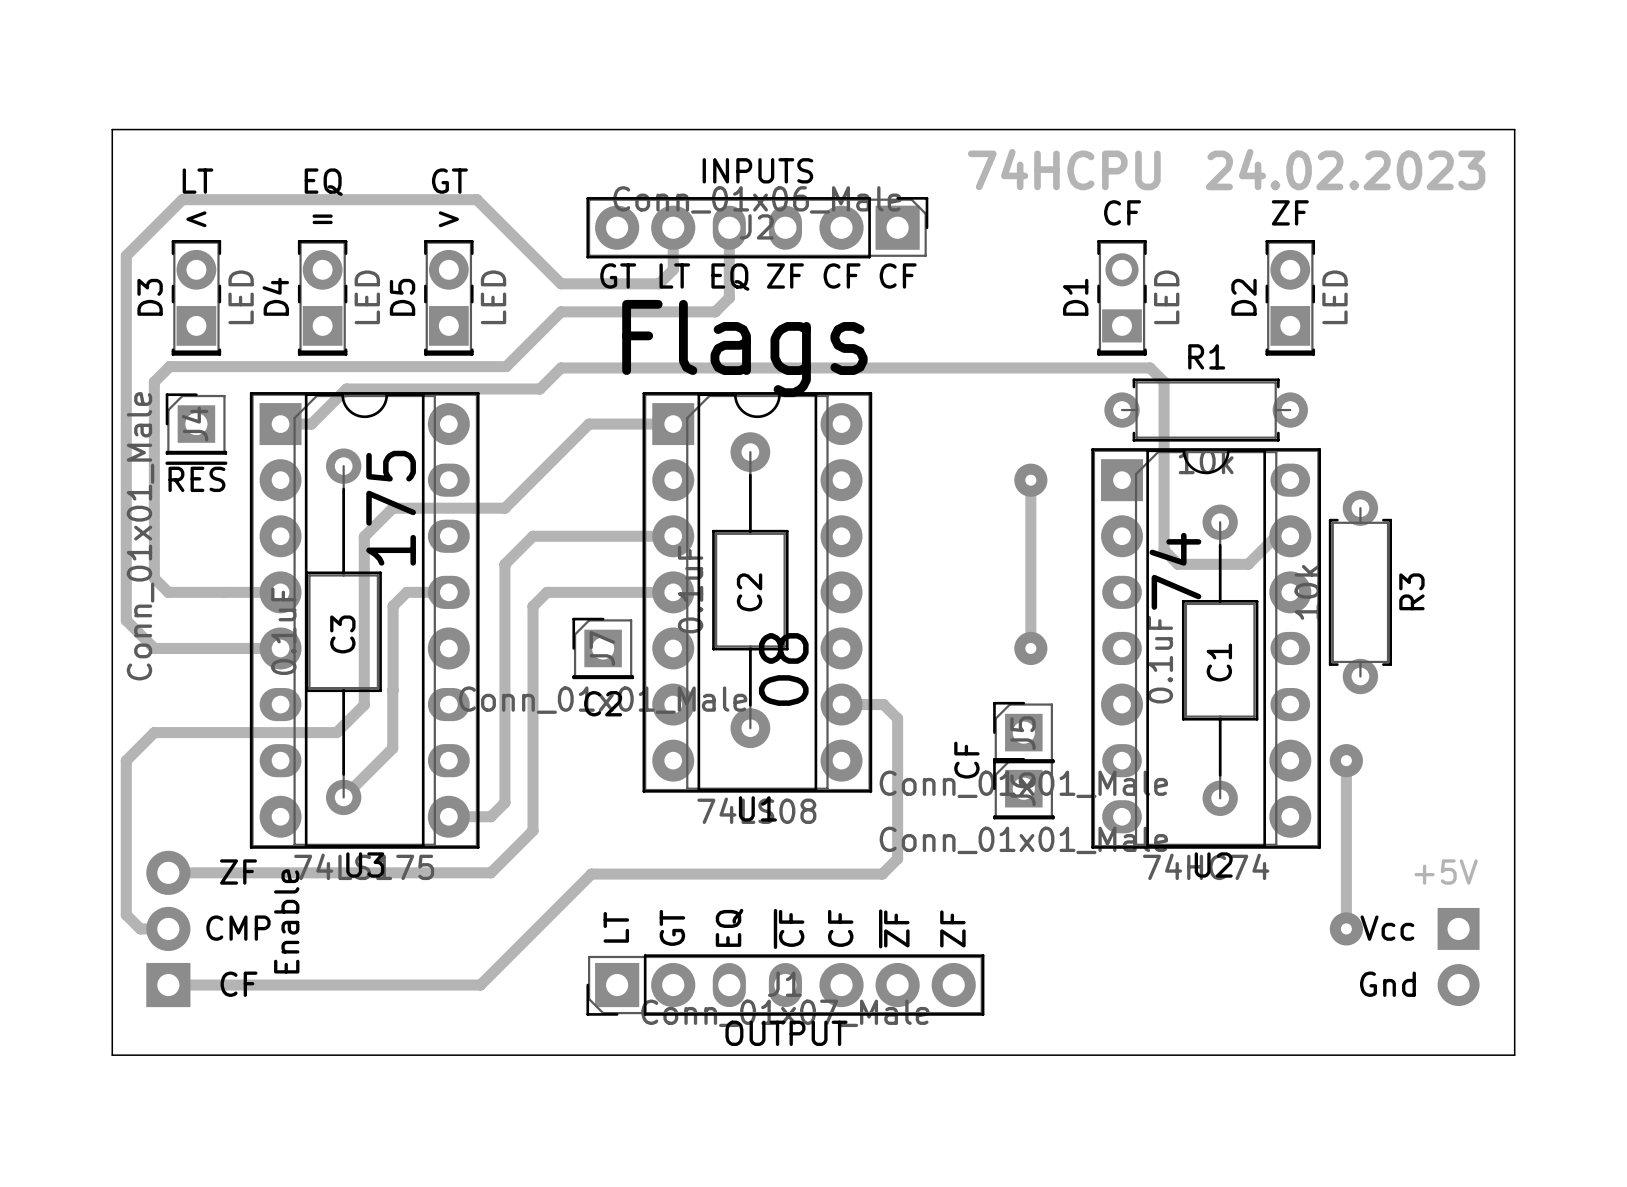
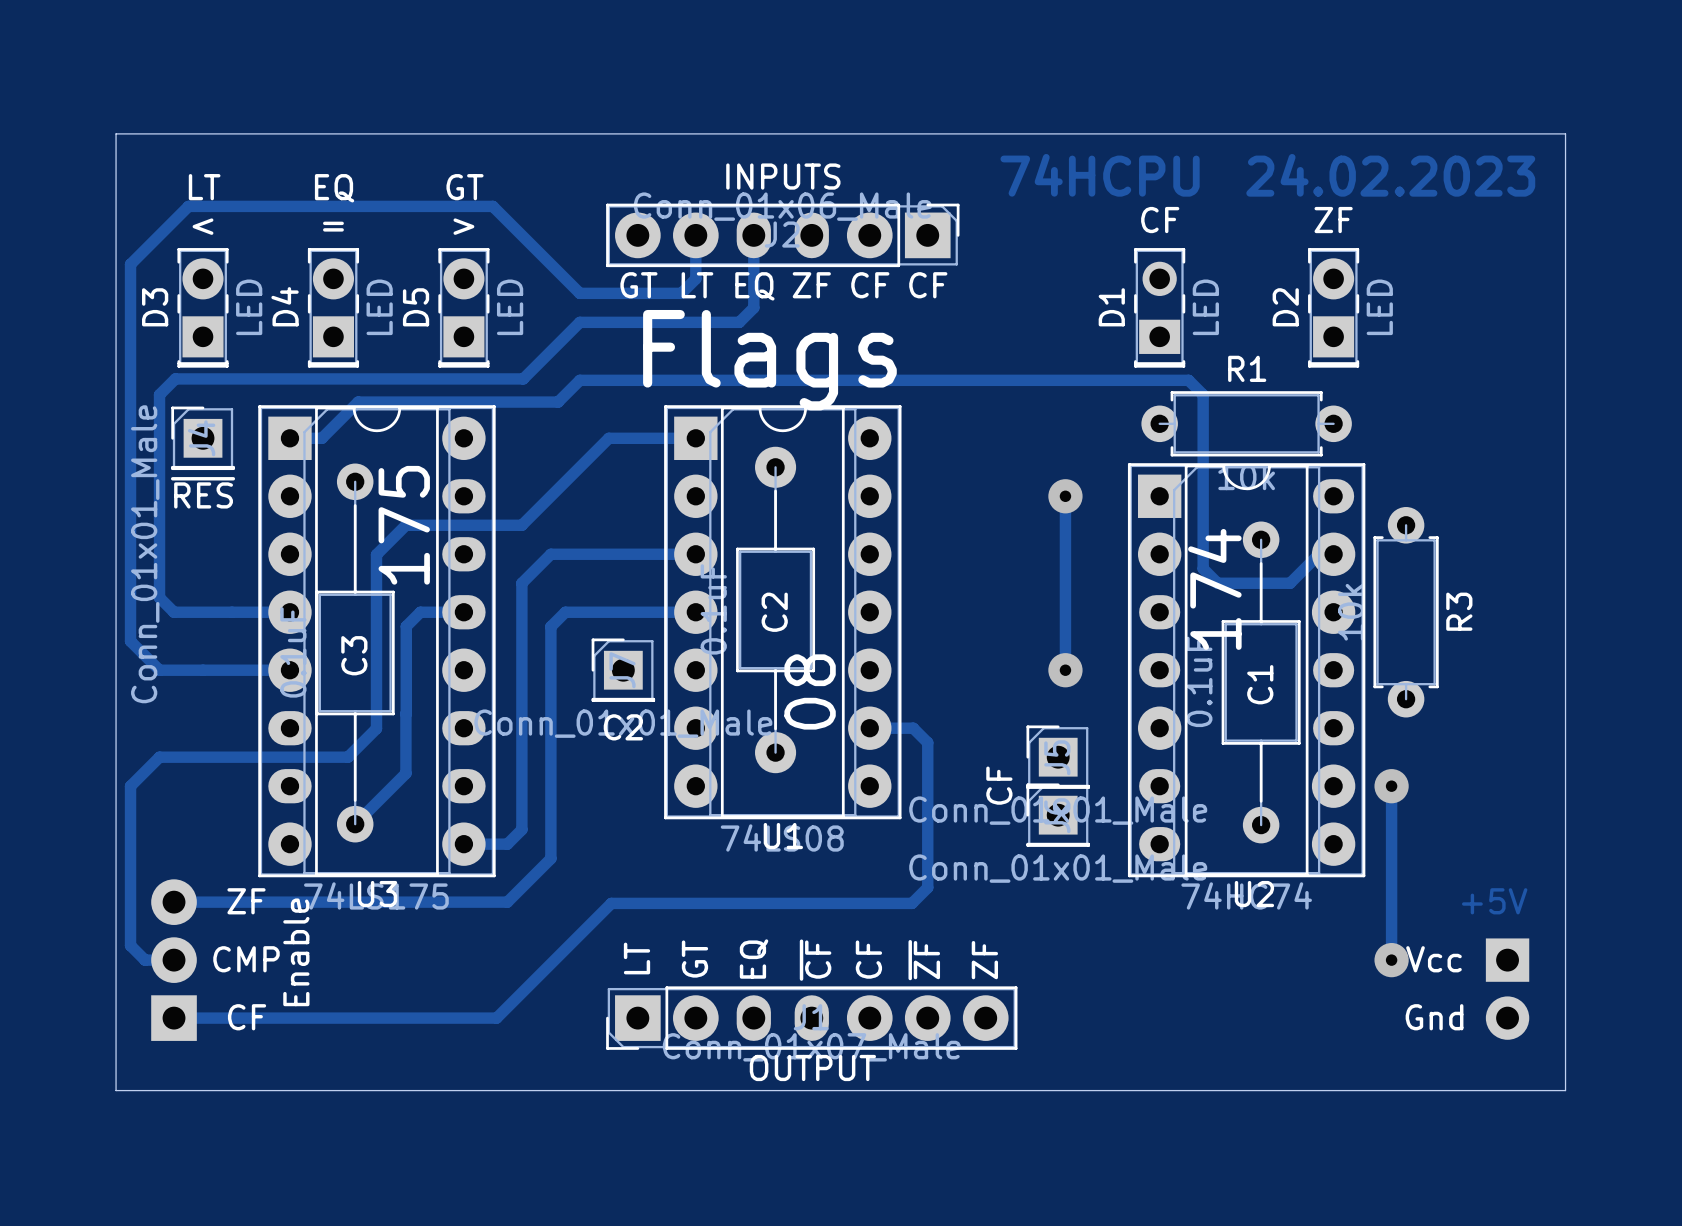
text: 74 (1175, 571) -> 174 (1214, 589)

